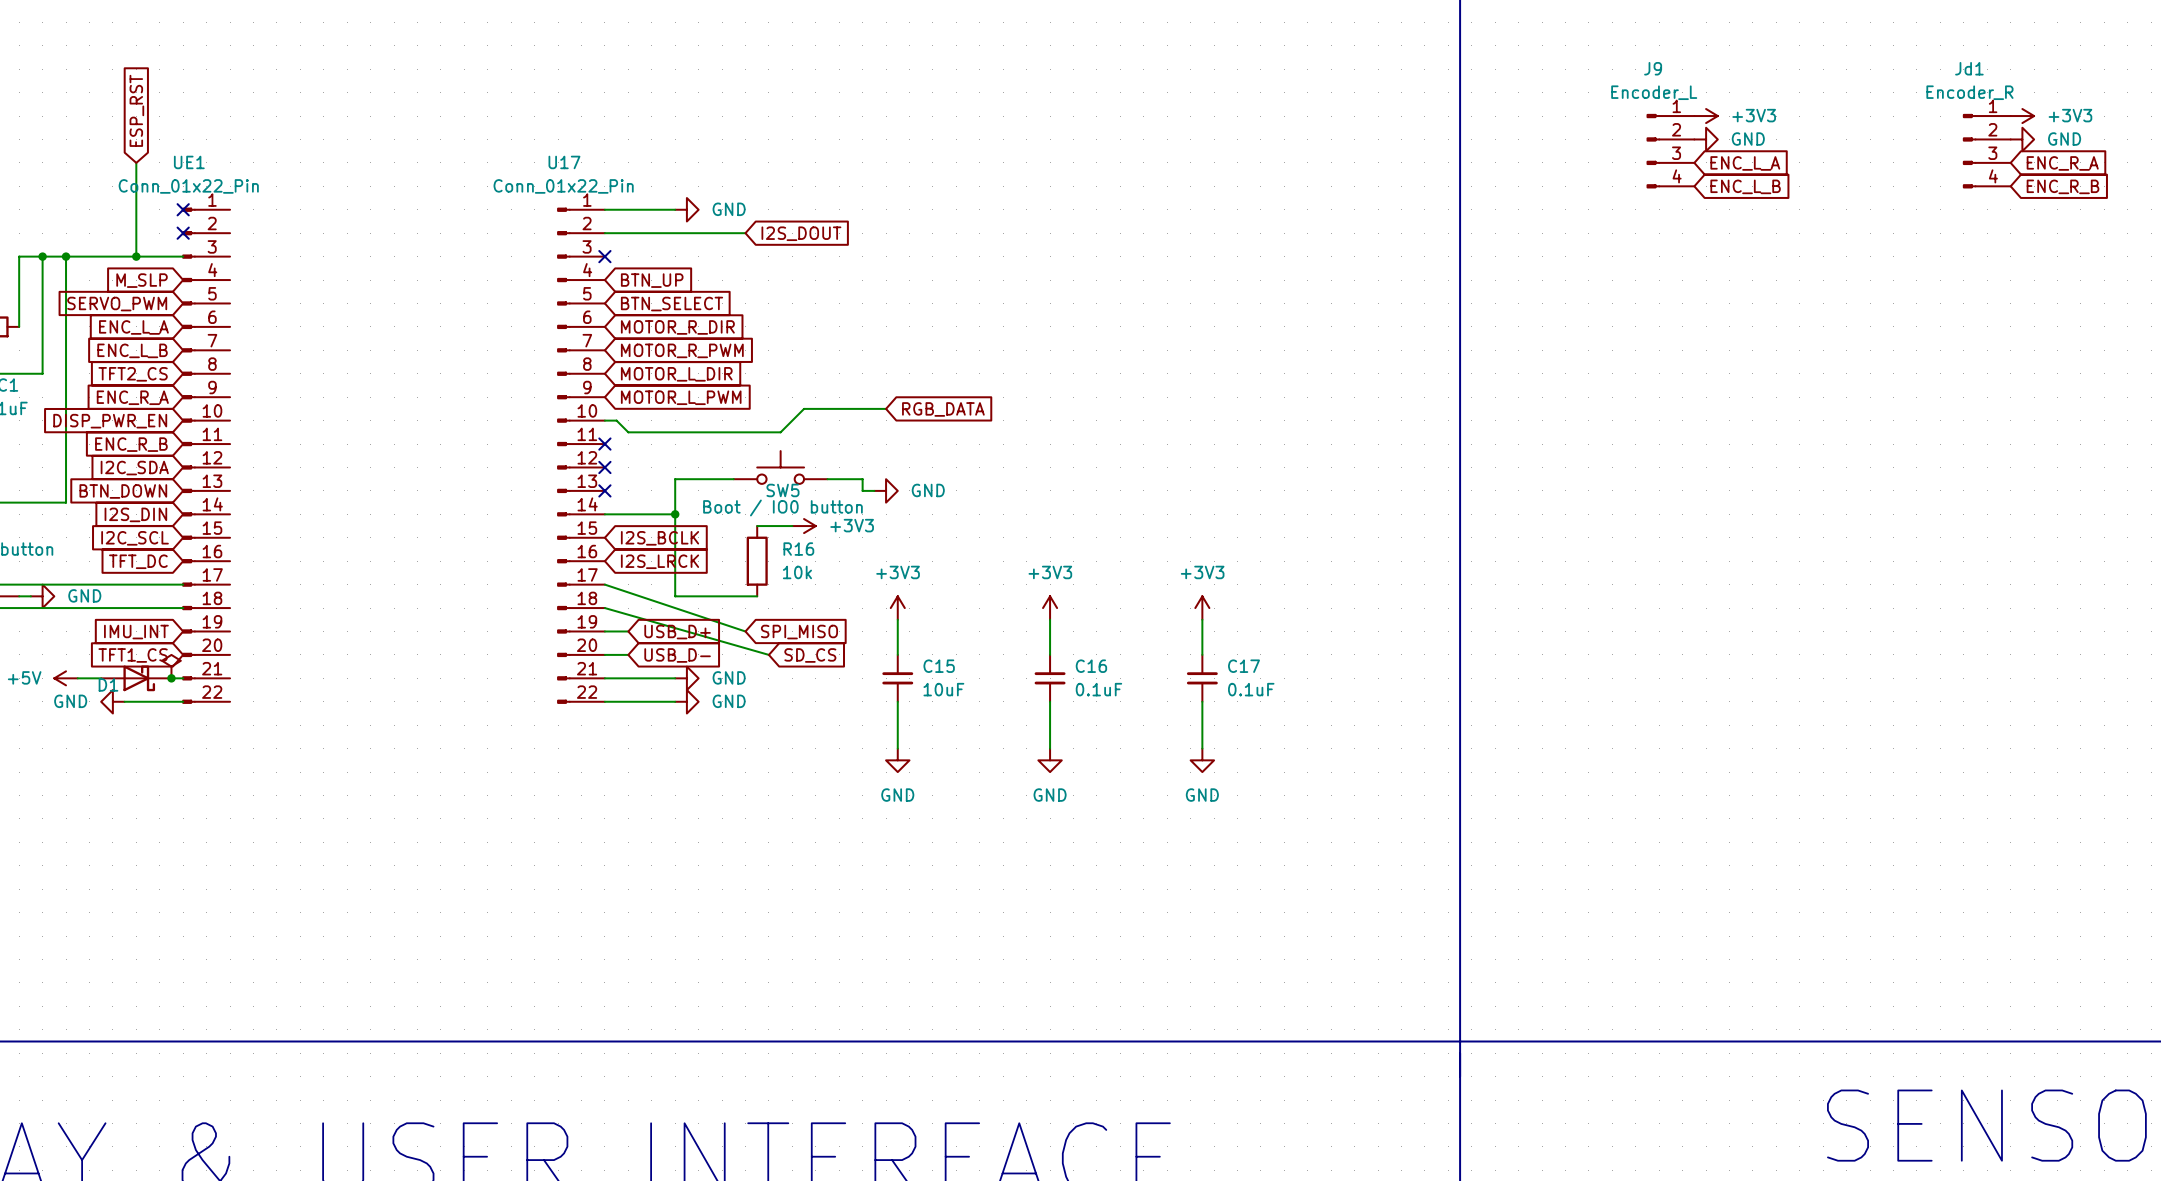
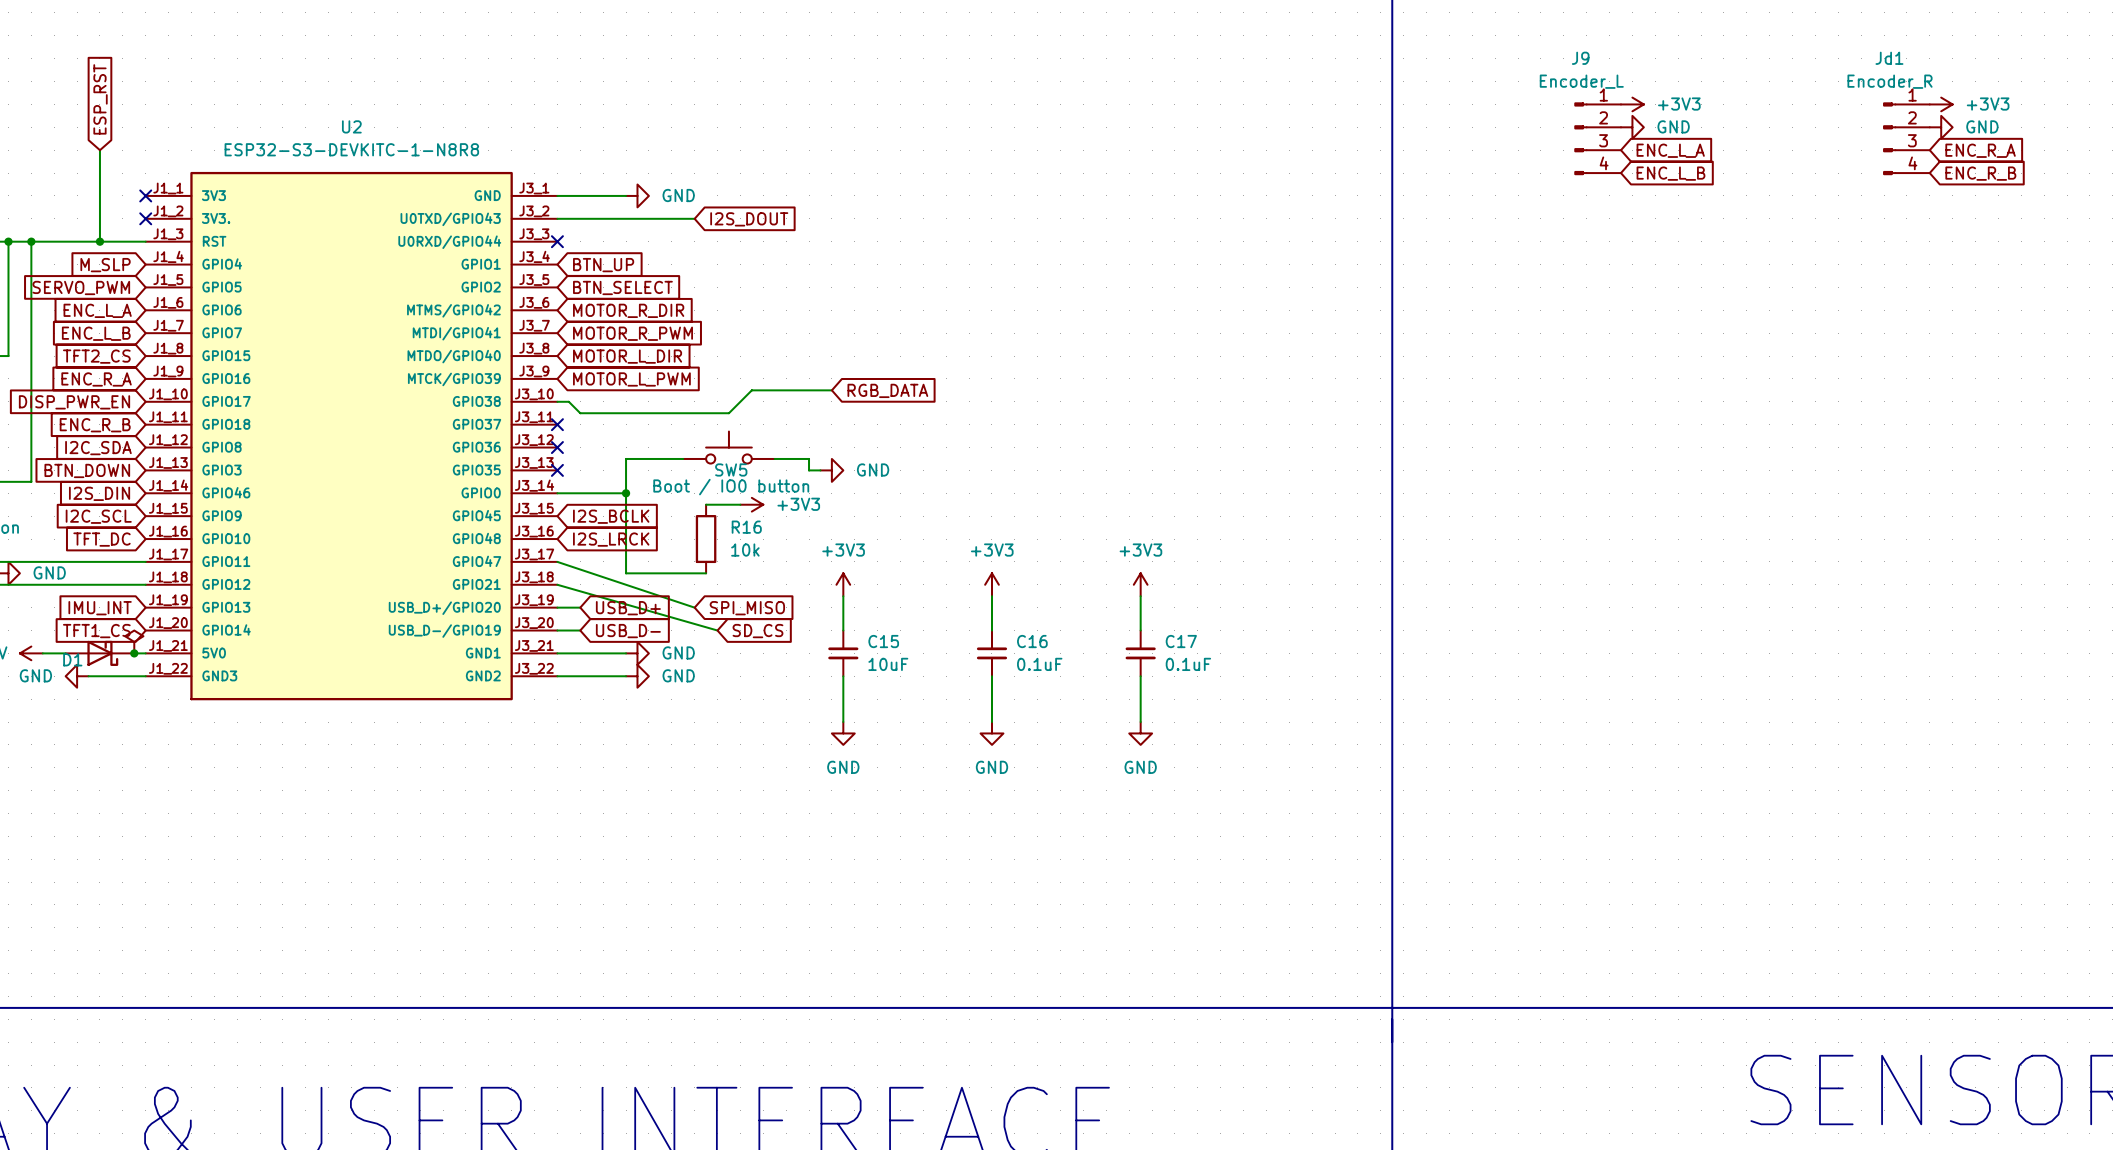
UE1: Conn_01x22_Pin (206, 455) -> none
U2: none -> ESP32-S3-DEVKITC-1-N8R8 (351, 436)
U17: Conn_01x22_Pin (581, 455) -> none

